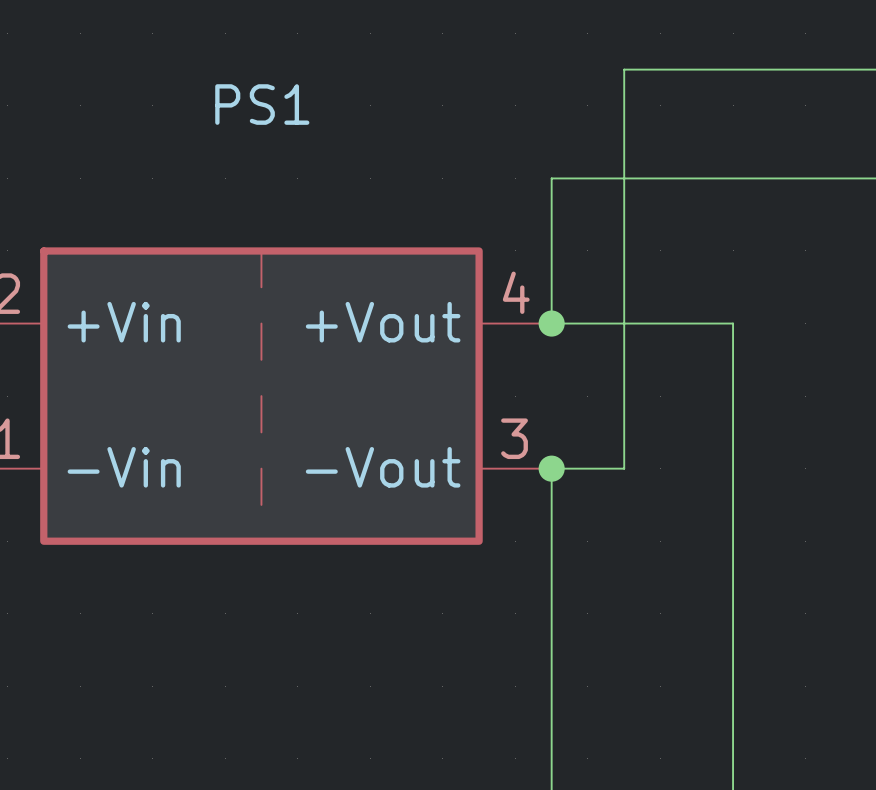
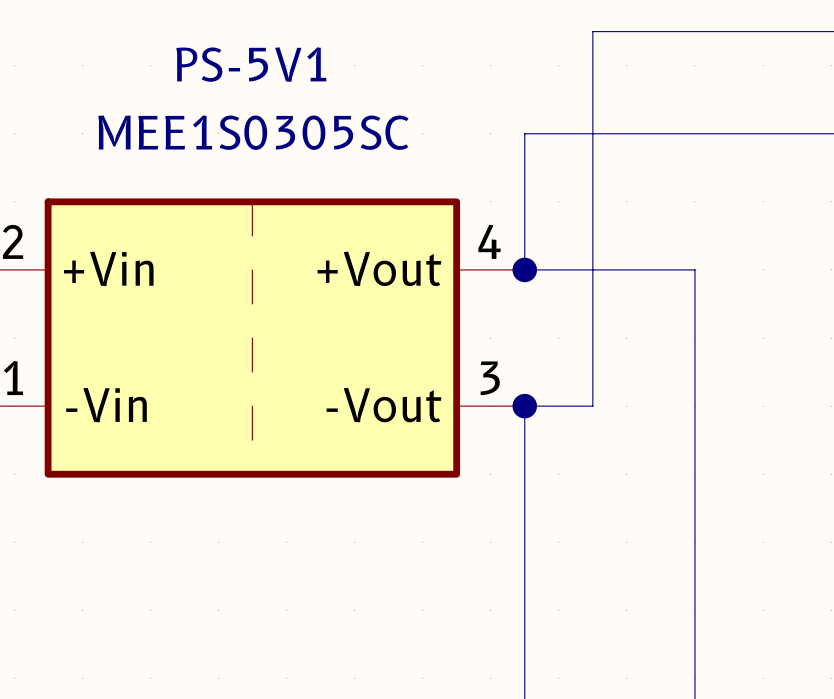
PS1 name: PS1 (262, 104) -> PS-5V1 (251, 64)
PS1 value: none -> MEE1S0305SC (253, 132)

